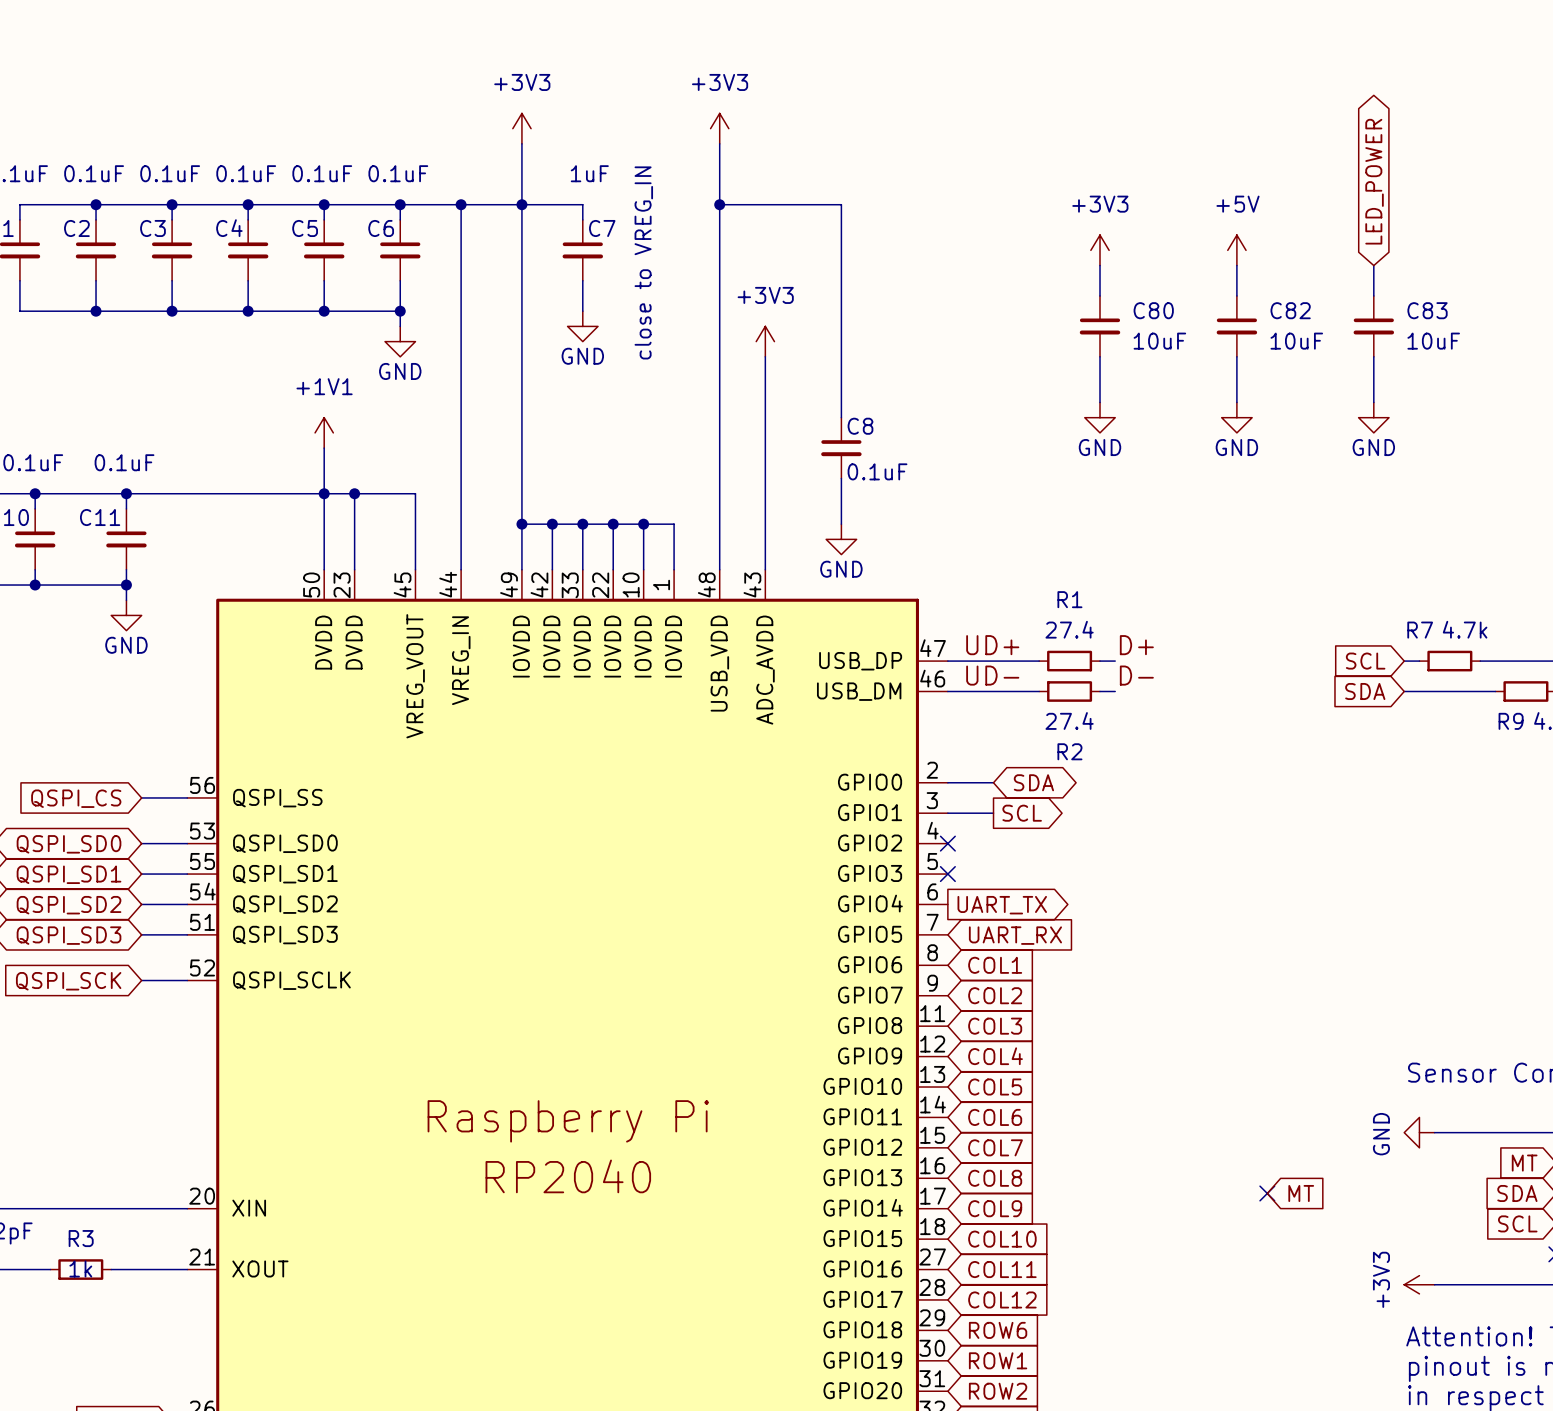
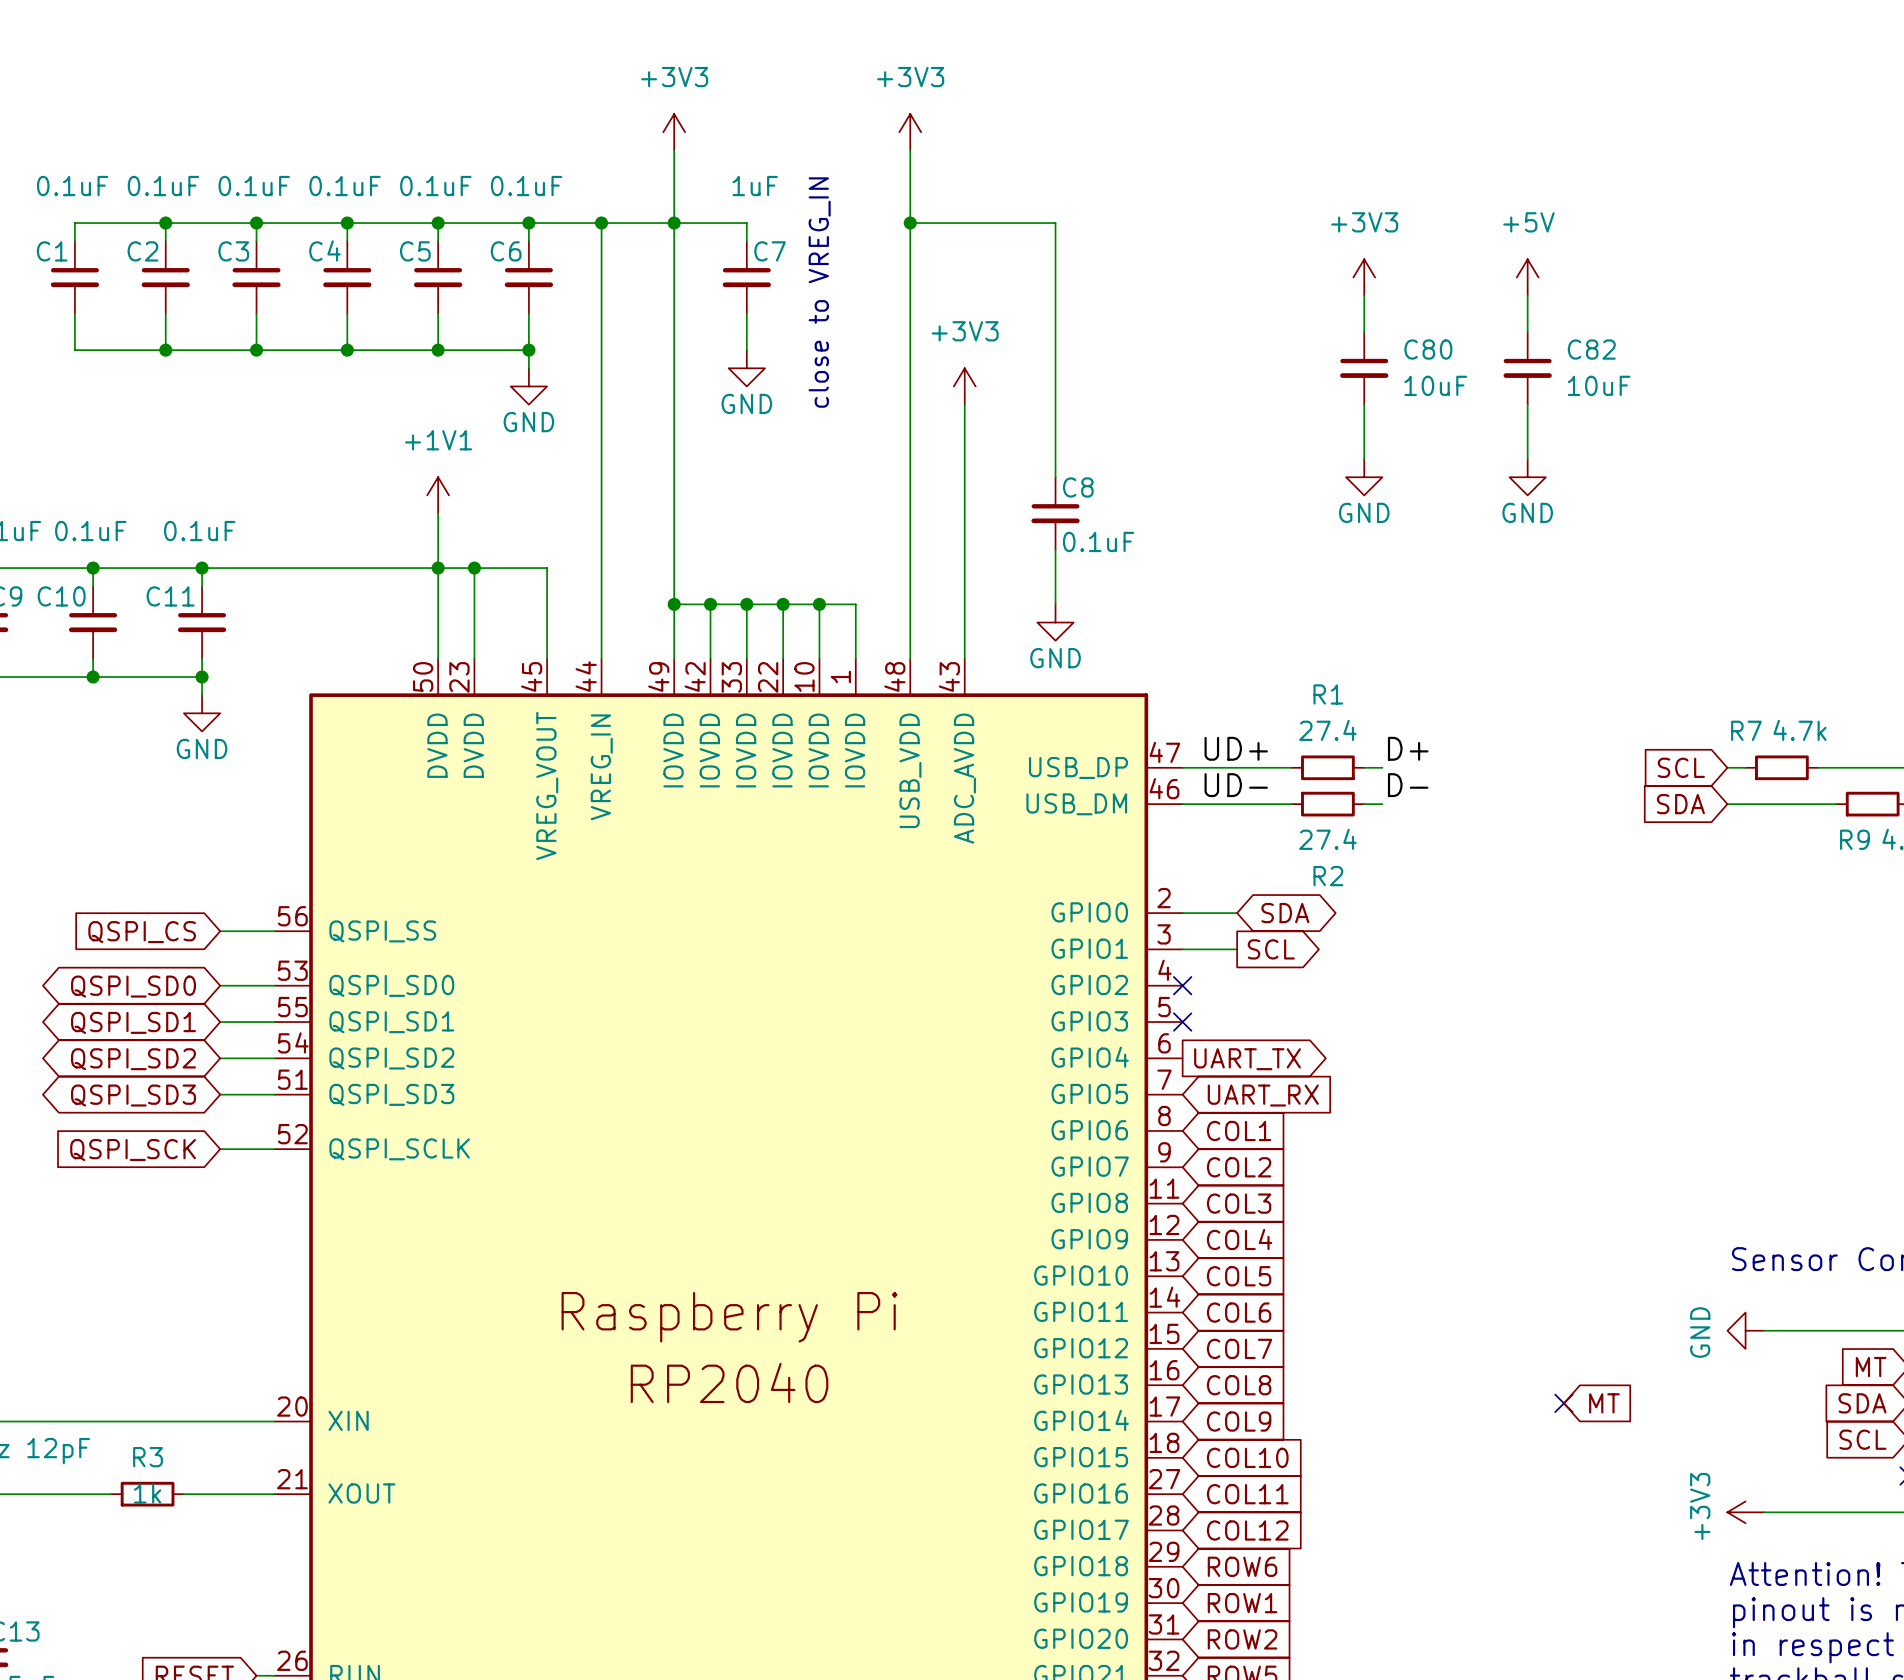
global label: LED_POWER (1374, 181) -> none
wire: (1373, 265) (1373, 295) -> none
C83: 10uF (1373, 326) -> none
wire: (1373, 356) (1373, 402) -> none
power symbol: GND (1373, 417) -> none

